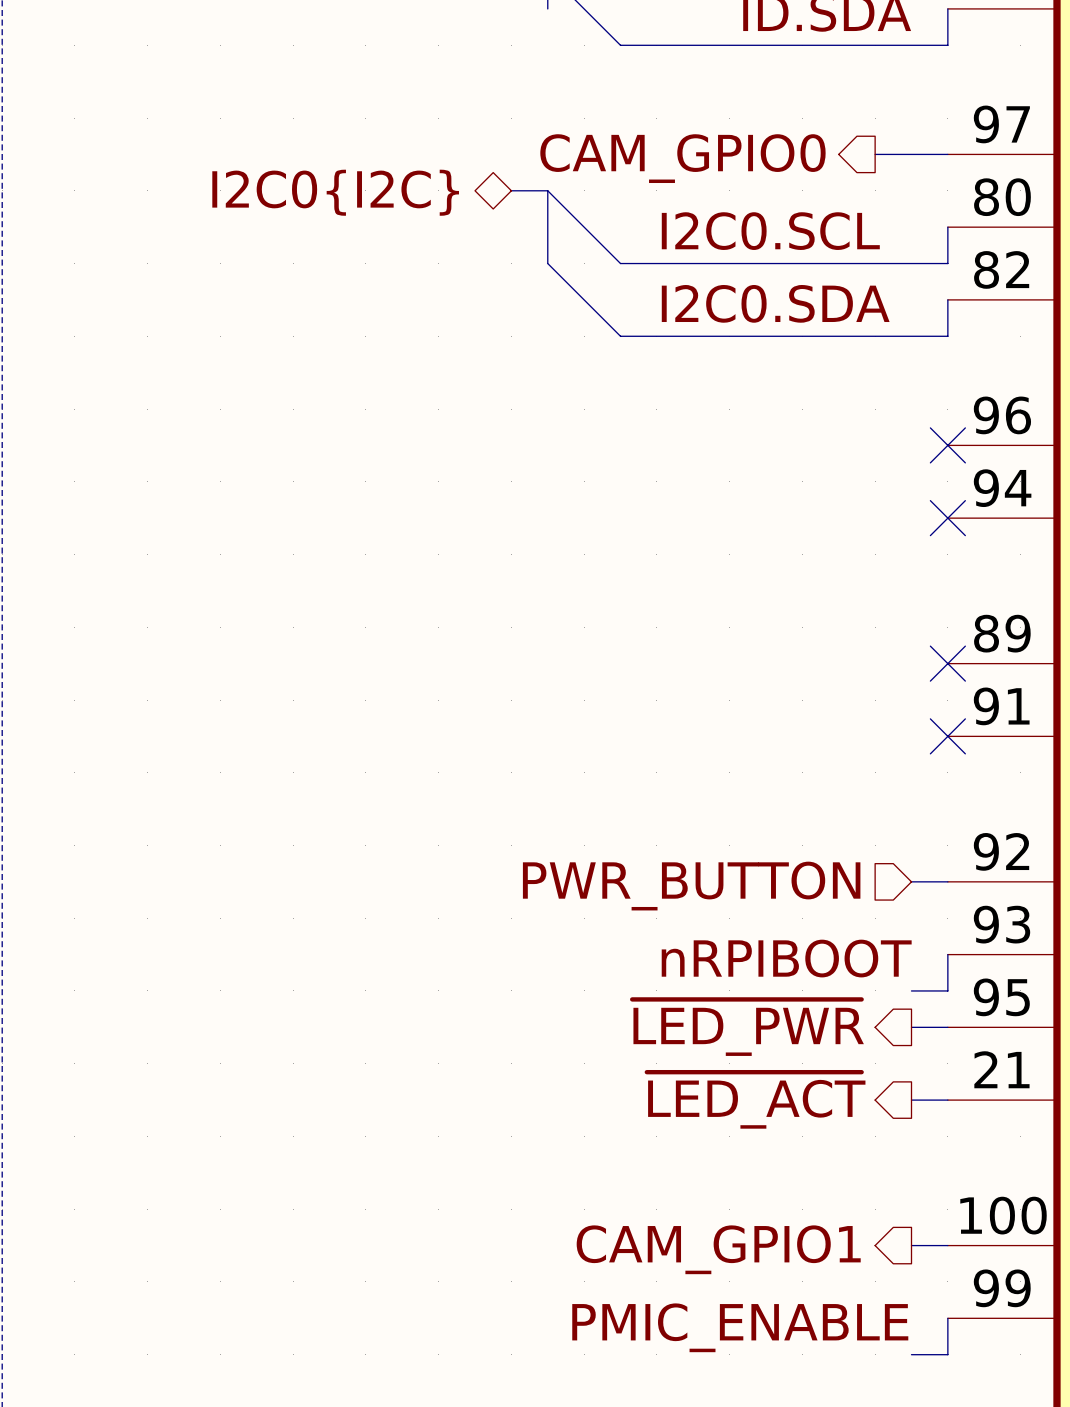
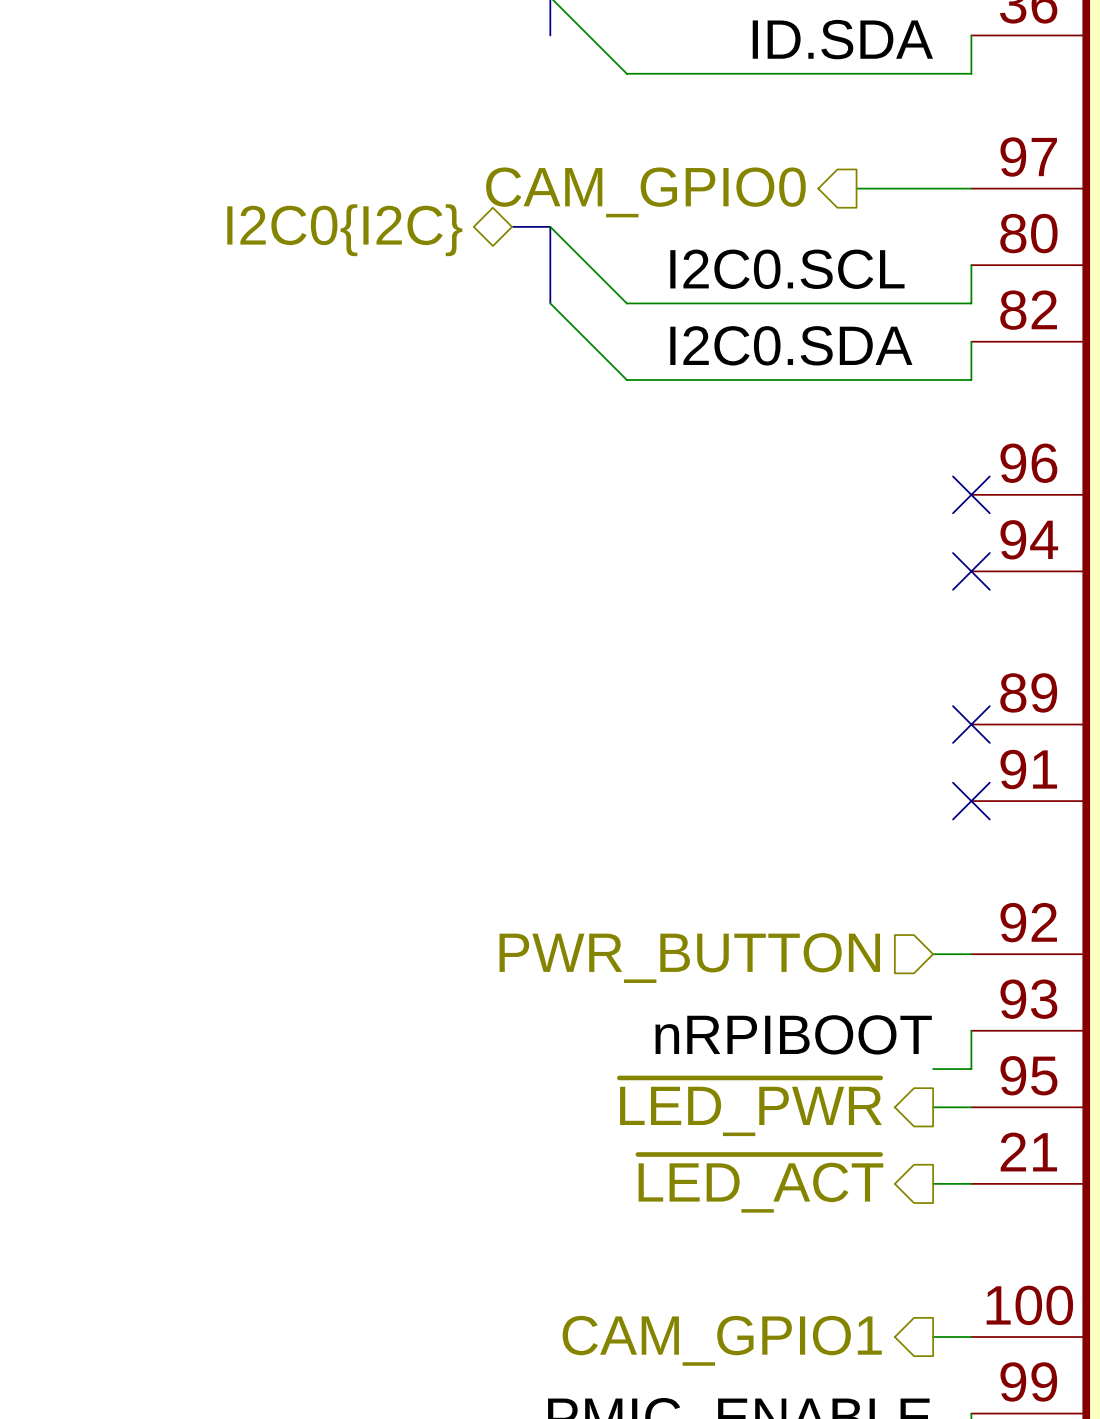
wire: none -> (856, 188) (894, 188)
hierarchical label position: CAM_GPIO0 (682, 158) -> CAM_GPIO0 (645, 192)

